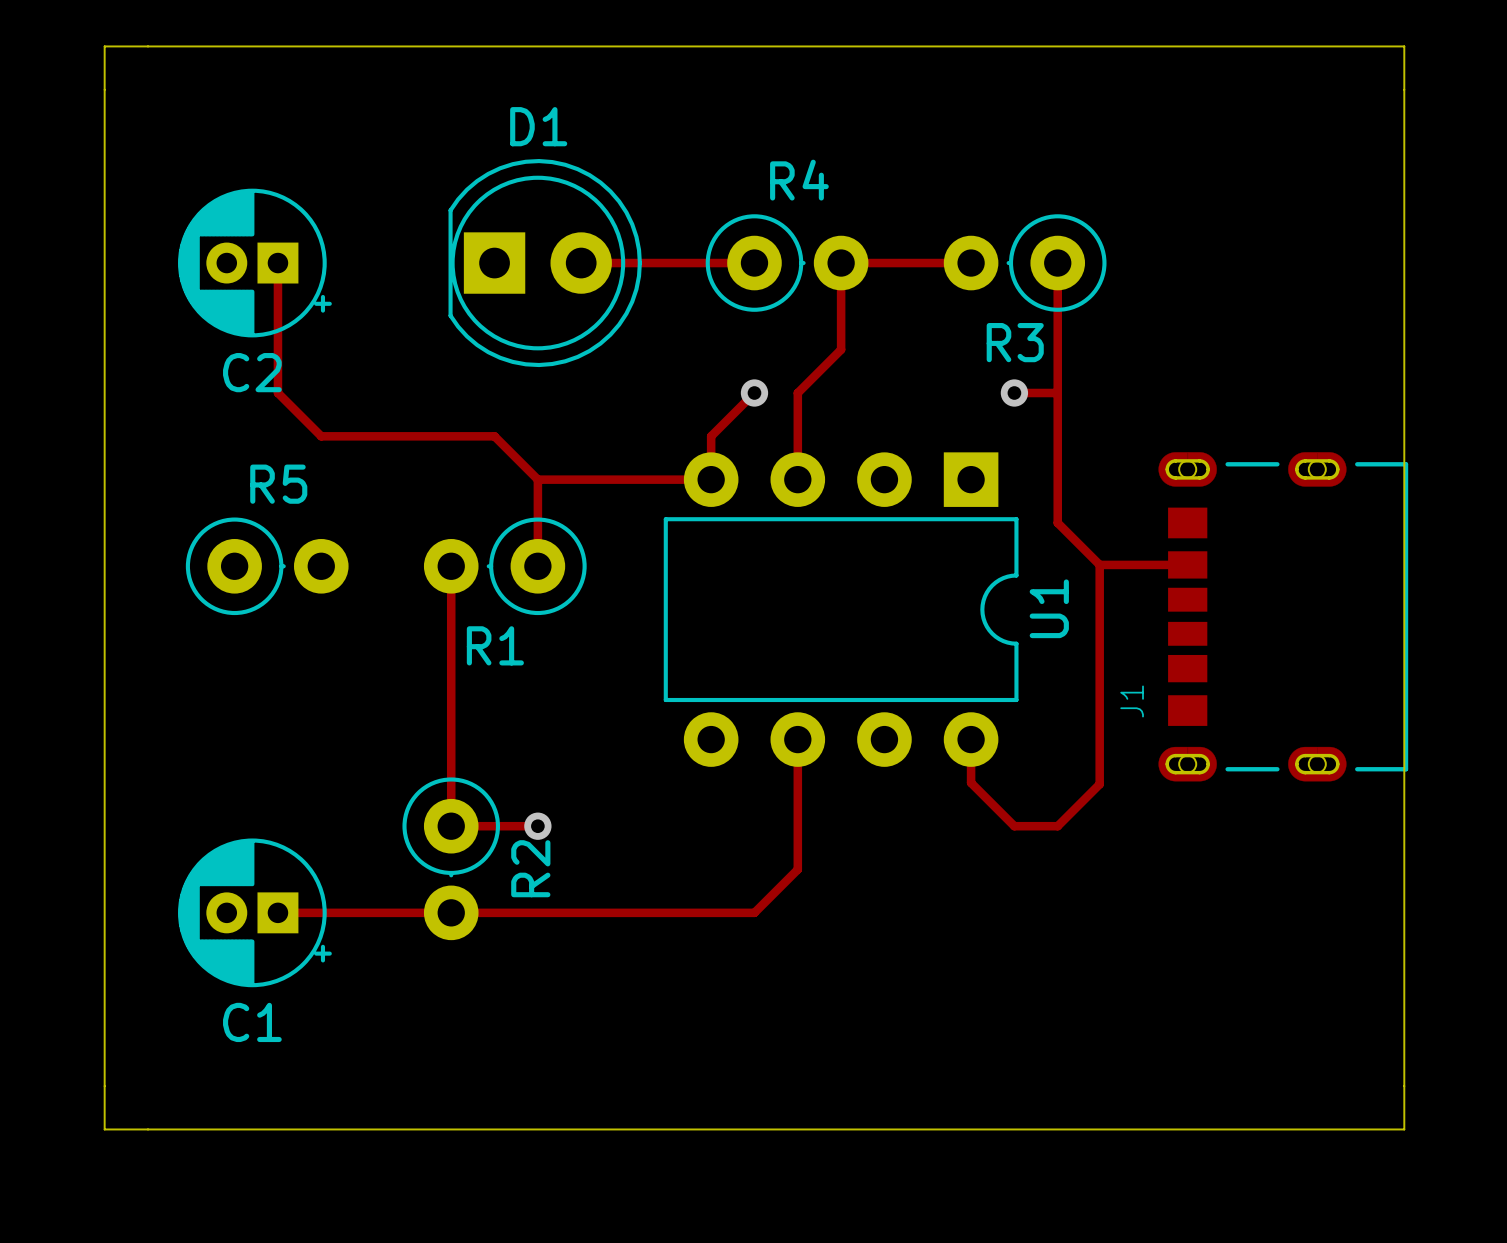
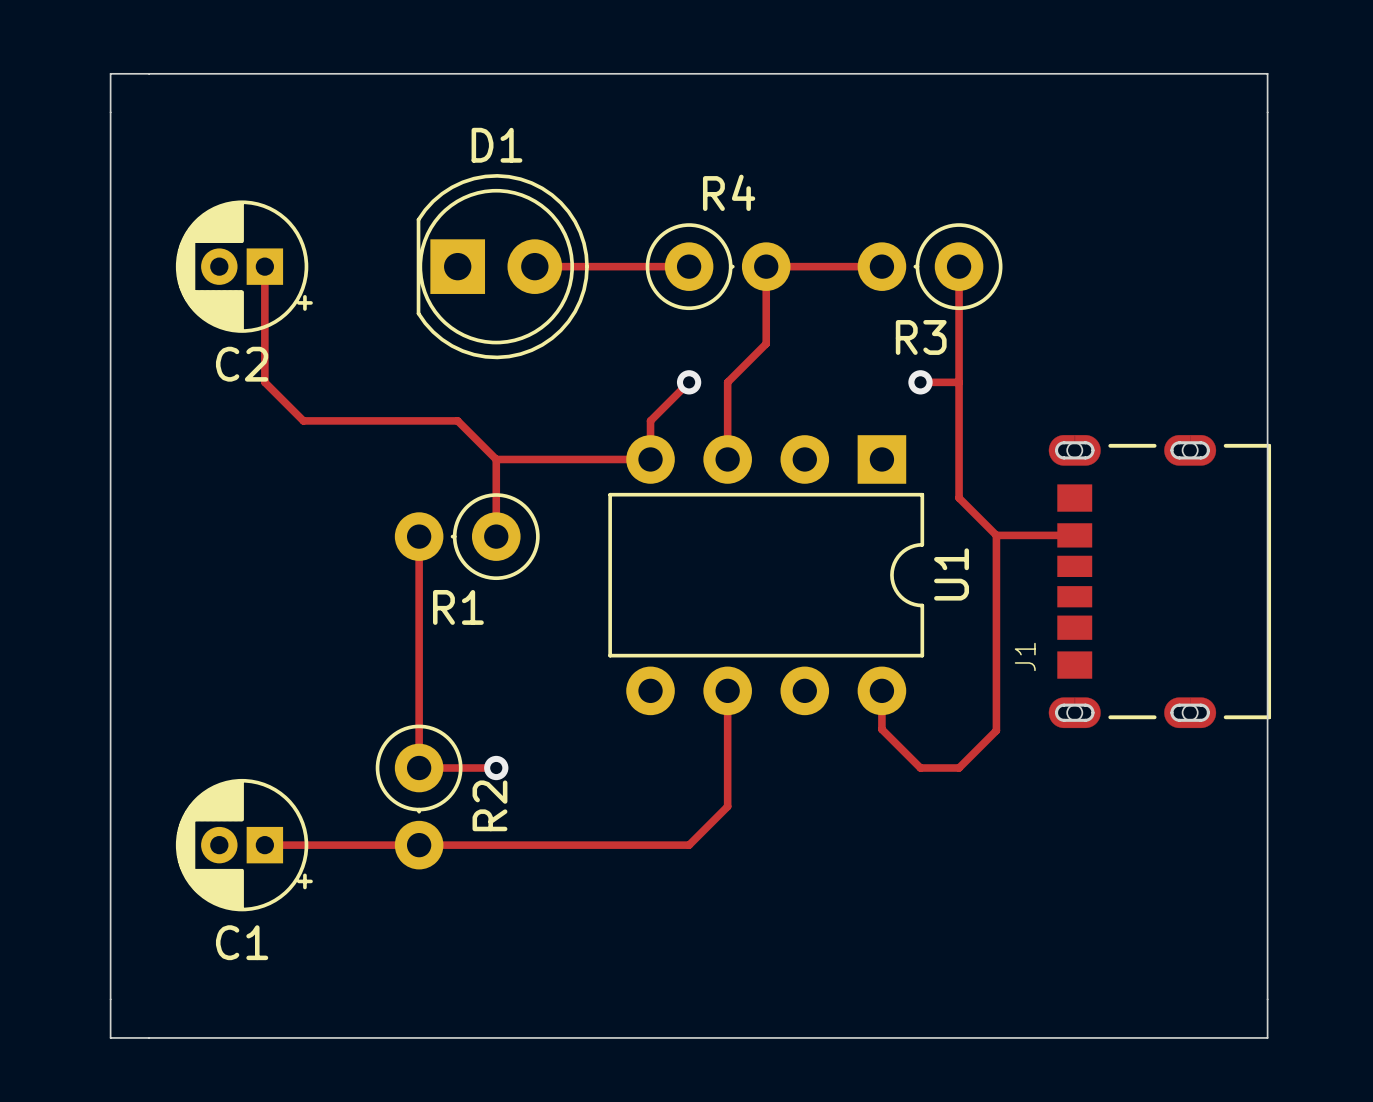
R5: (267, 566) -> none

